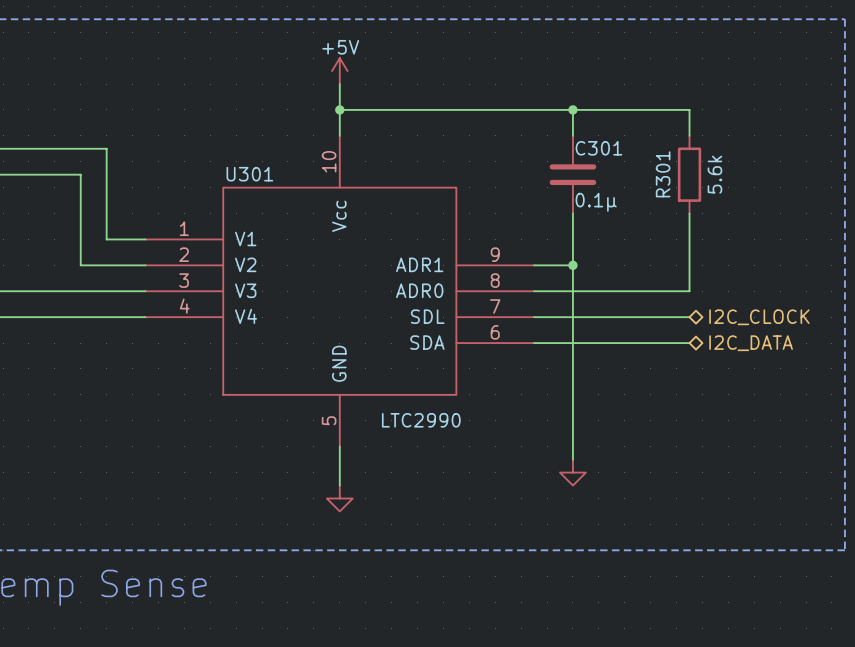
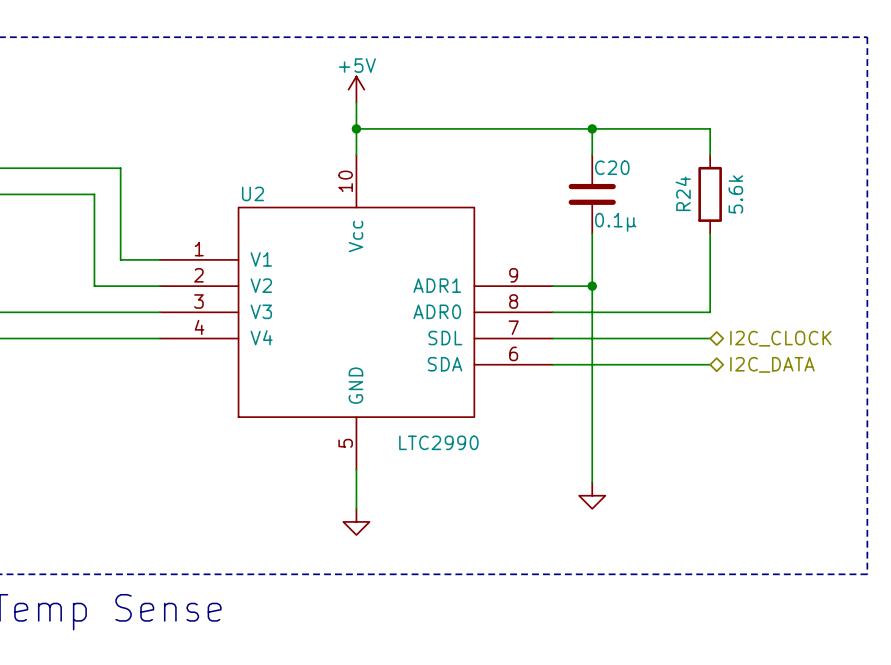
C301 name: C301 (598, 148) -> C20 (612, 167)
U301 name: U301 (249, 174) -> U2 (252, 193)
R301 name: R301 (663, 174) -> R24 (683, 193)

